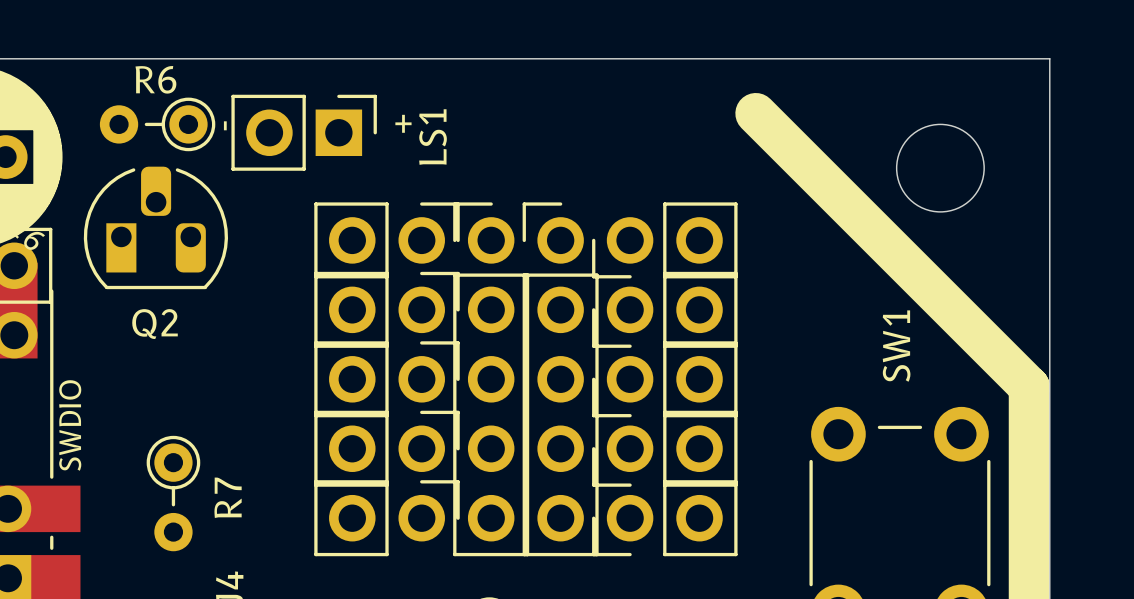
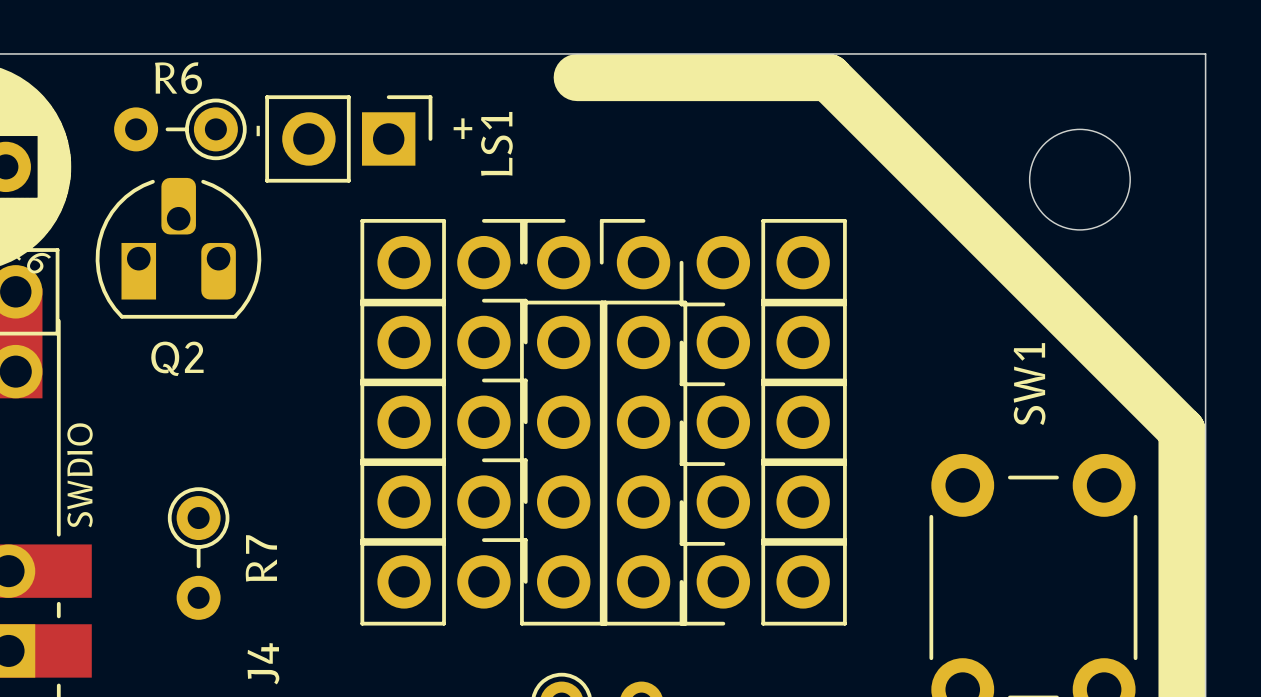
line: none -> (577, 77) (828, 77) (867, 116)

